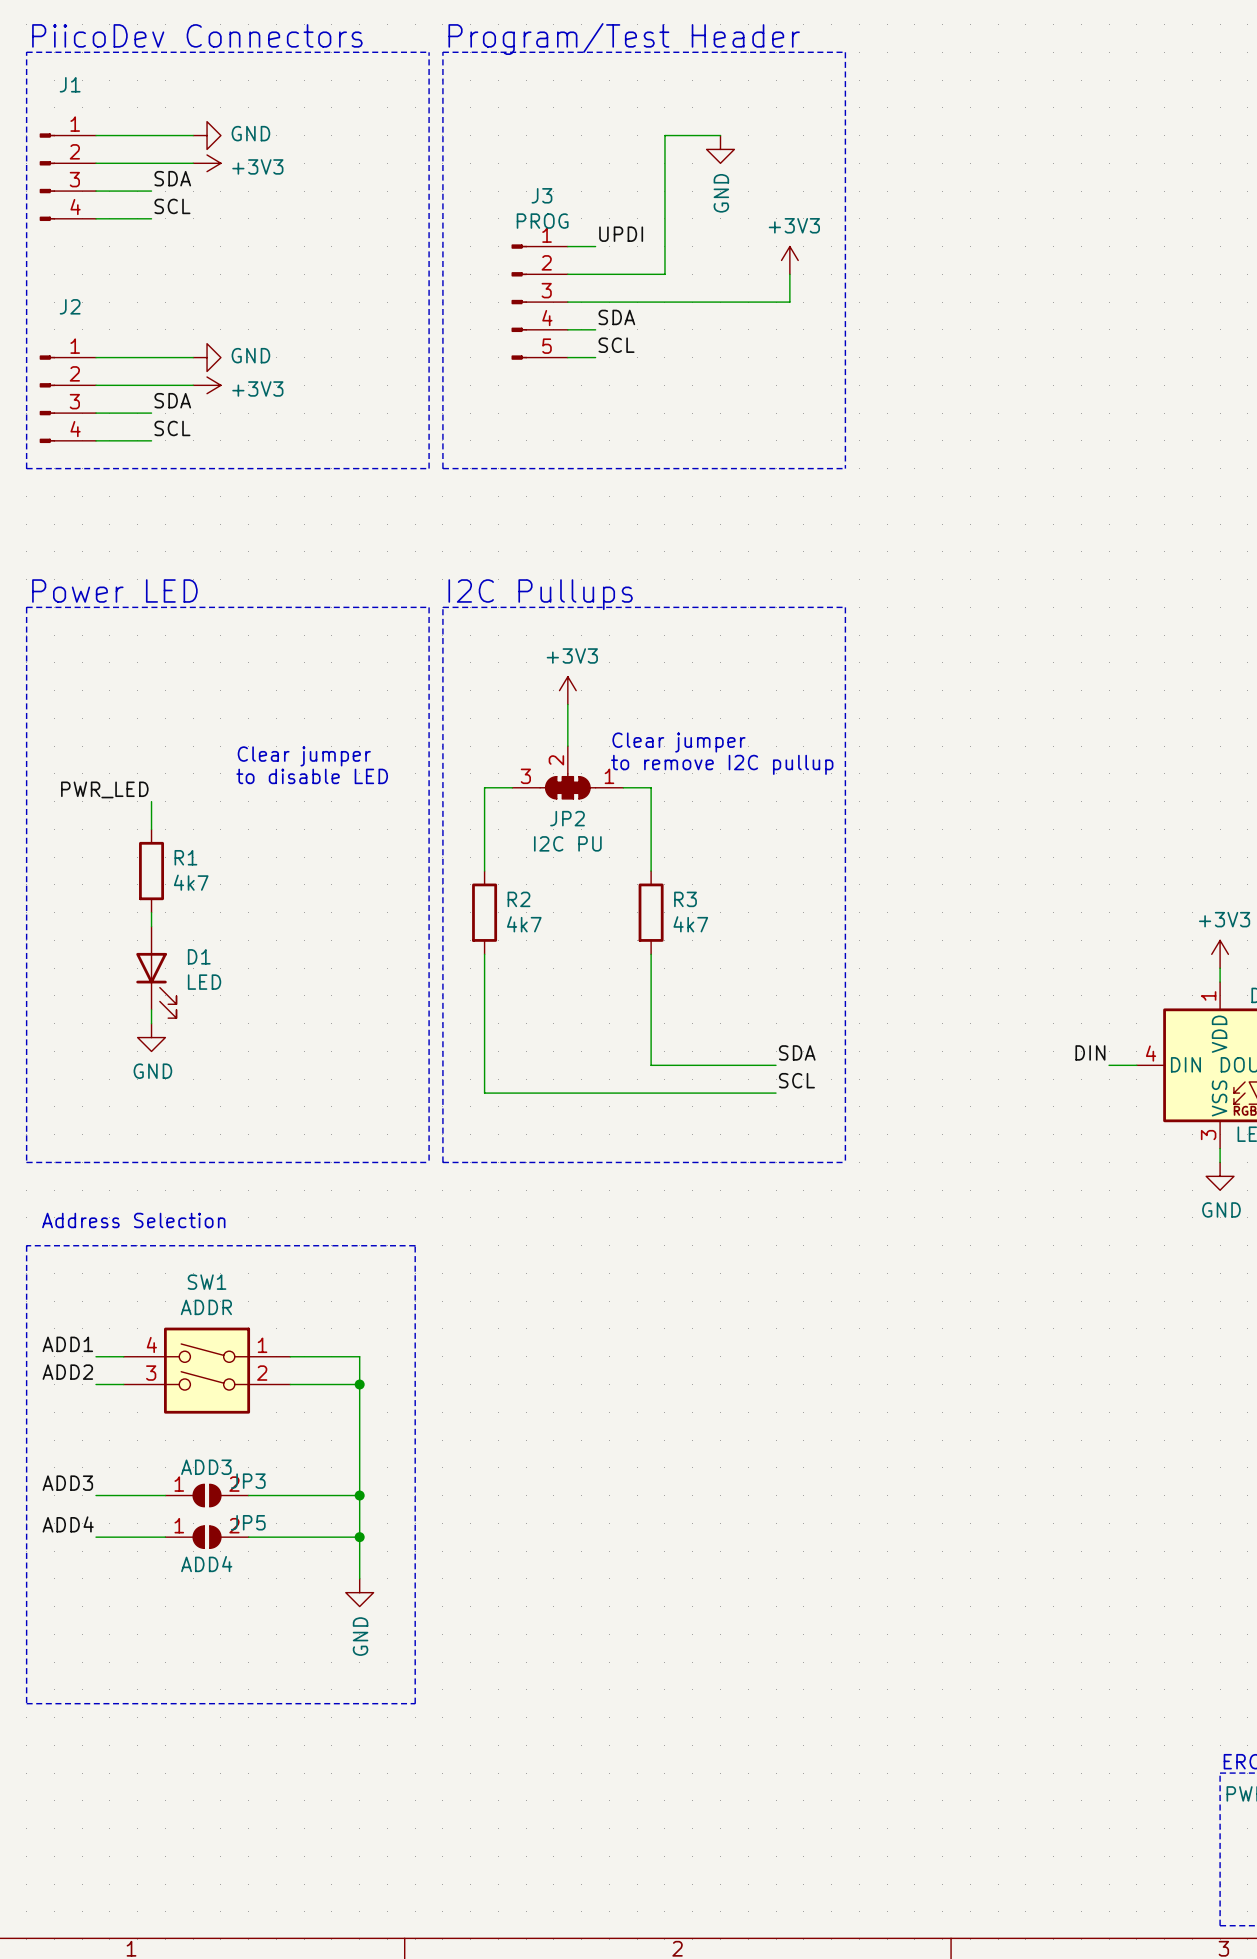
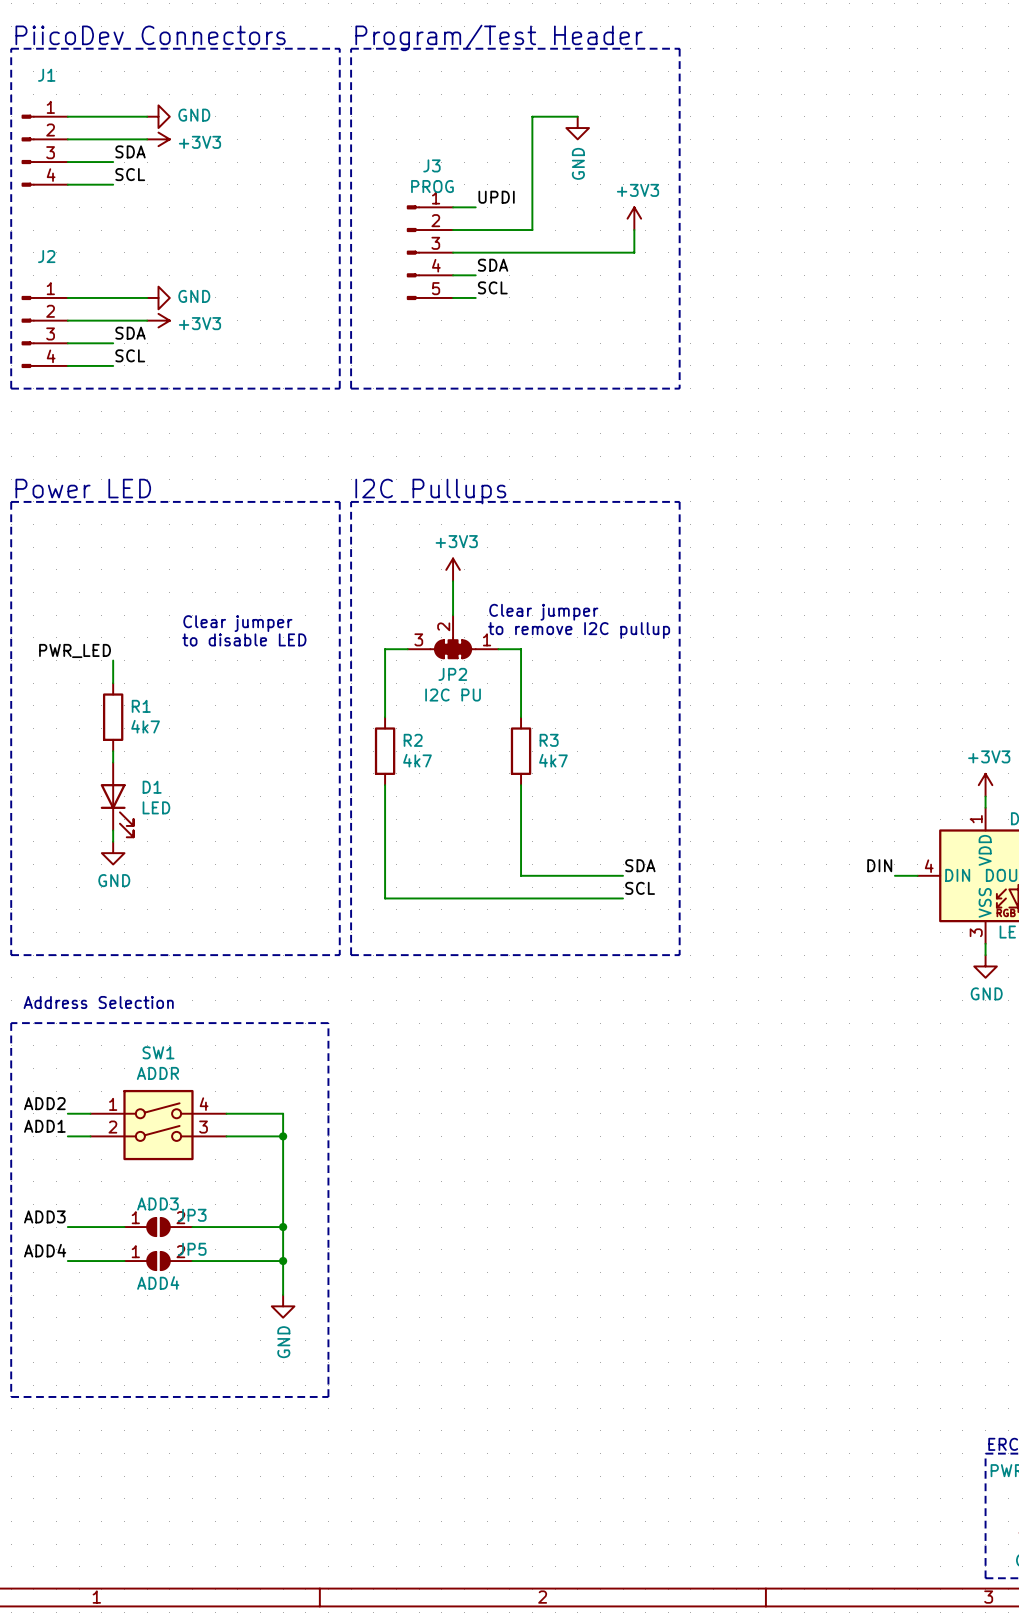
label: ADD1 (67, 1344) -> ADD2 (44, 1103)
SW1 flip: as is (207, 1370) -> left-right (158, 1125)
label: ADD2 (67, 1372) -> ADD1 (44, 1126)

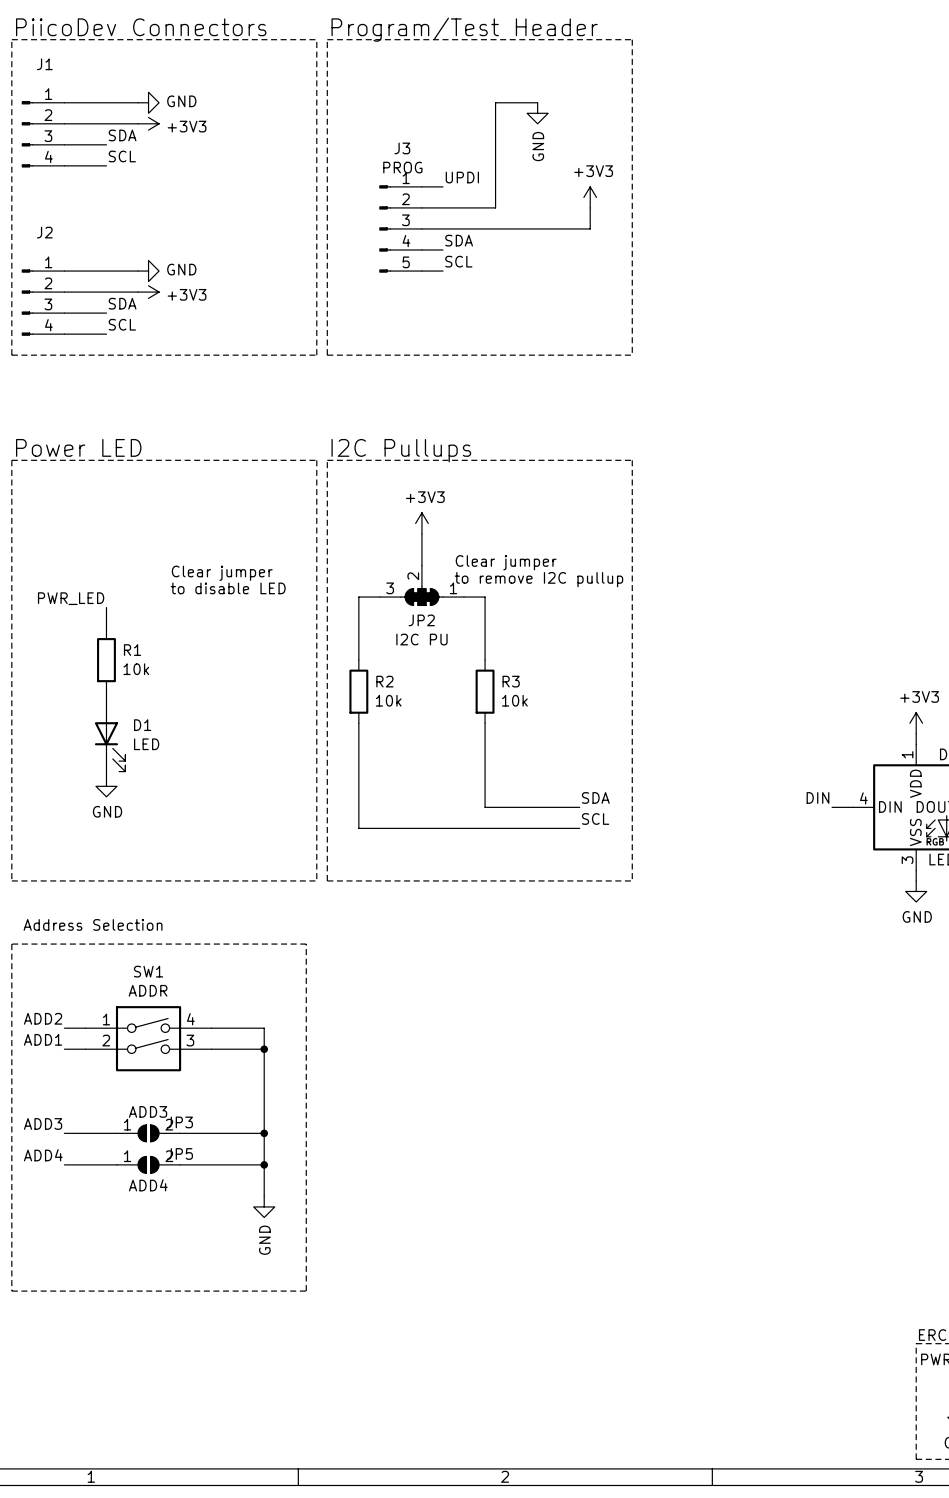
R1 value: 4k7 (145, 726) -> 10k (136, 669)
R2 value: 4k7 (417, 760) -> 10k (388, 700)
R3 value: 4k7 (553, 760) -> 10k (514, 700)

